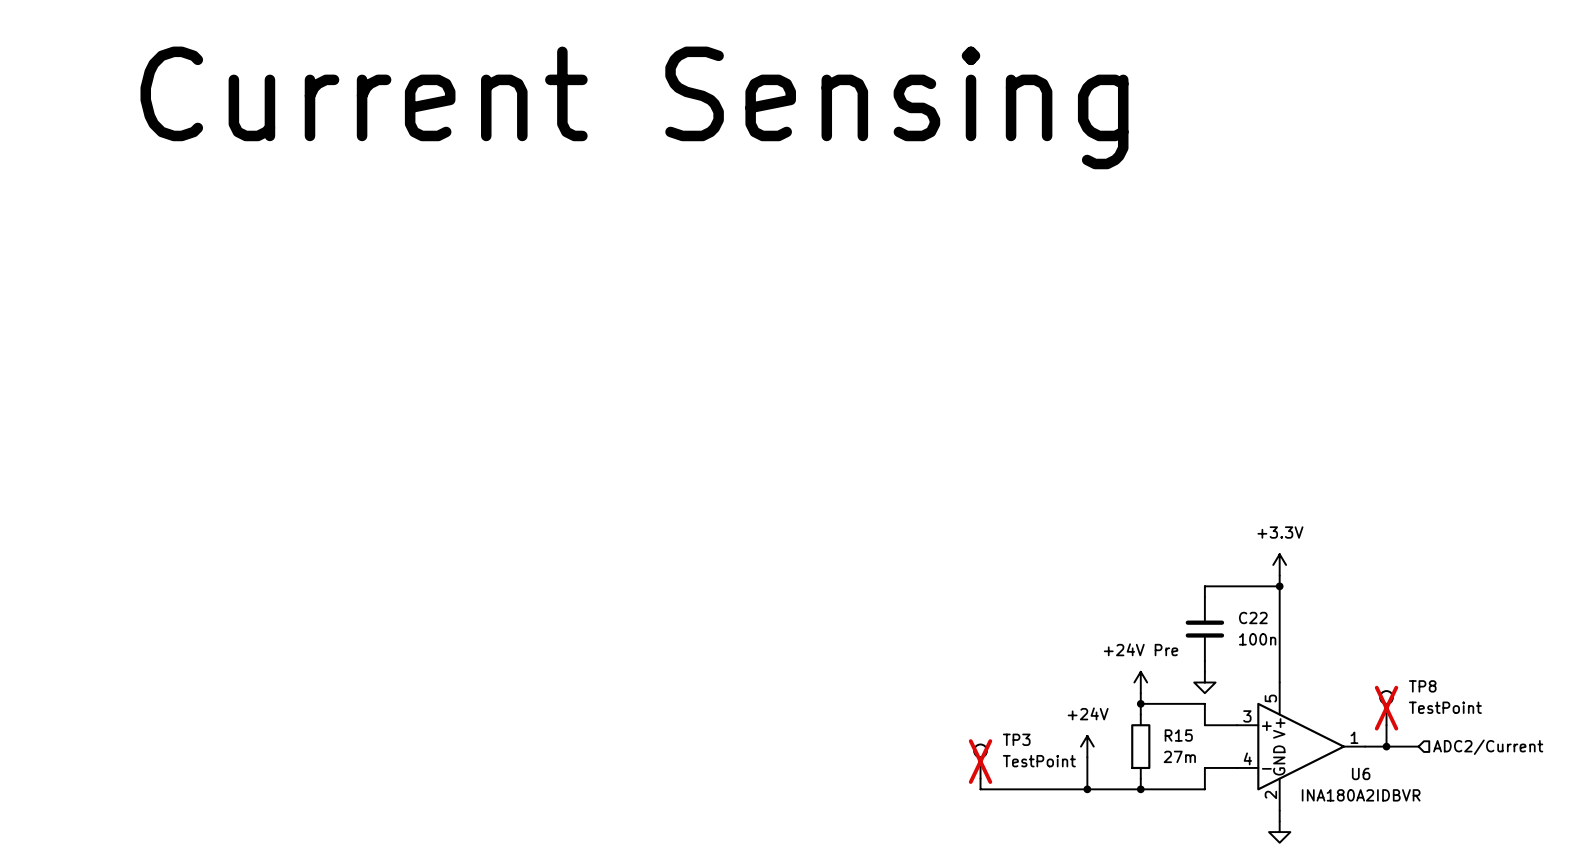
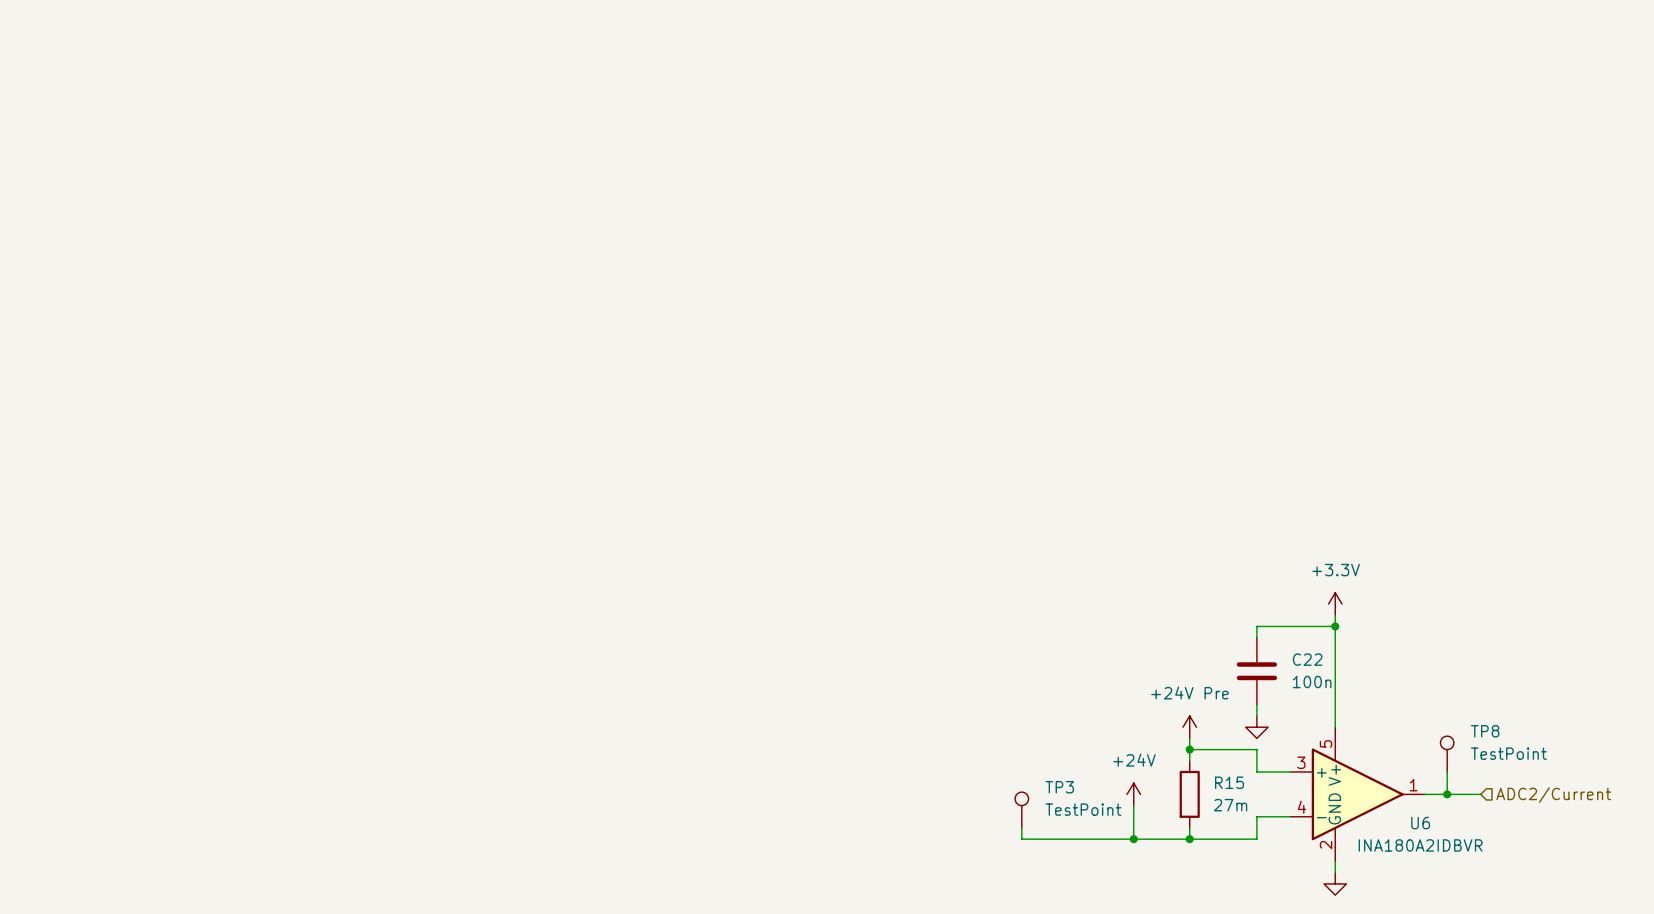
text: Current Sensing (634, 107) -> none
TP8 do-not-place cross: (1386, 708) -> none
TP3 do-not-place cross: (980, 761) -> none

